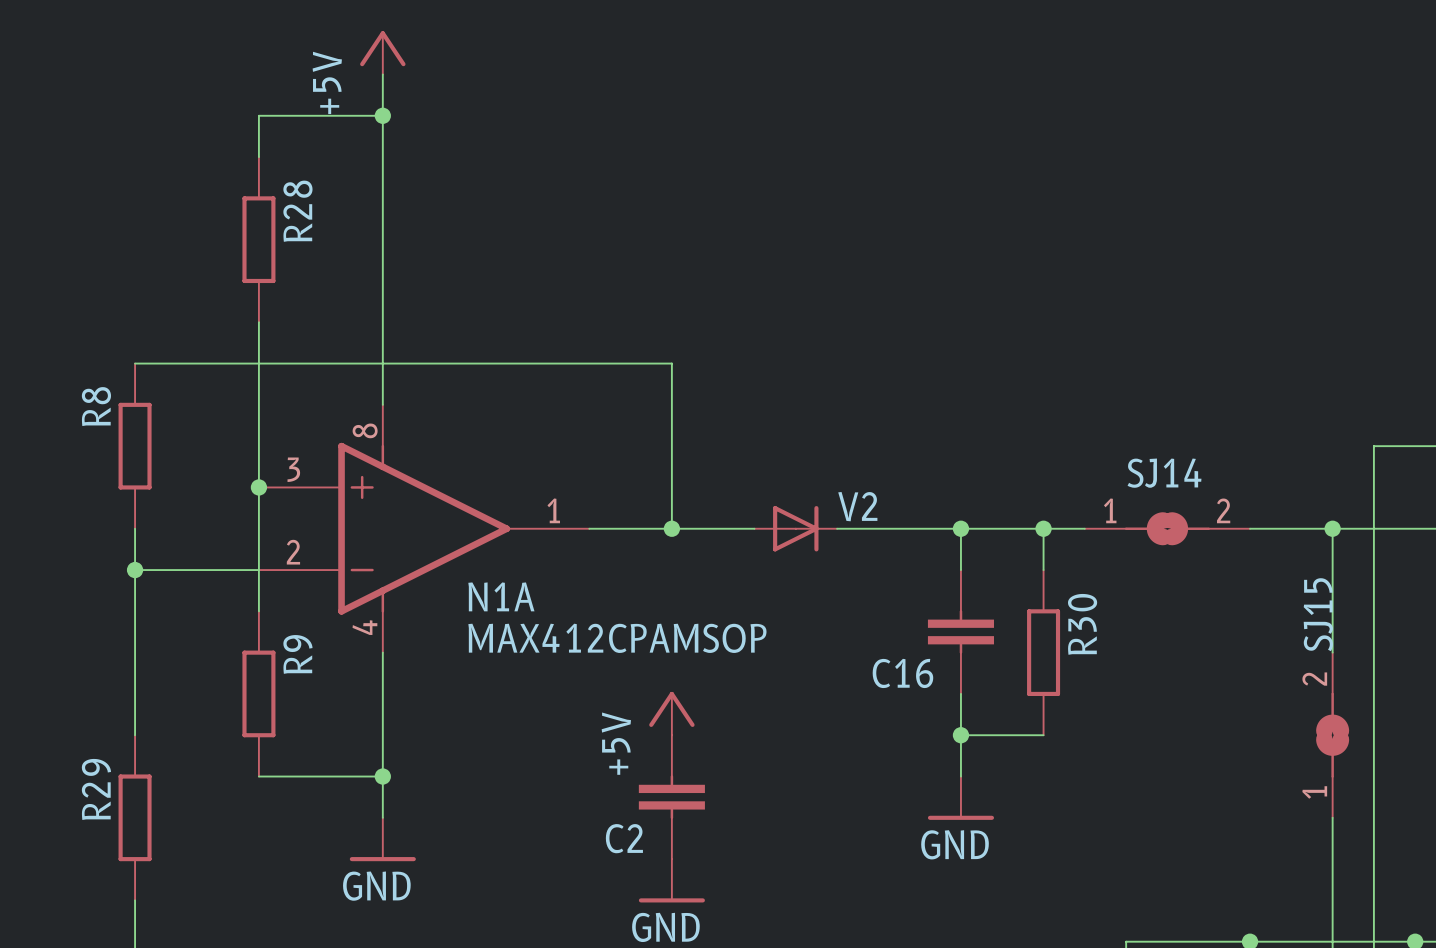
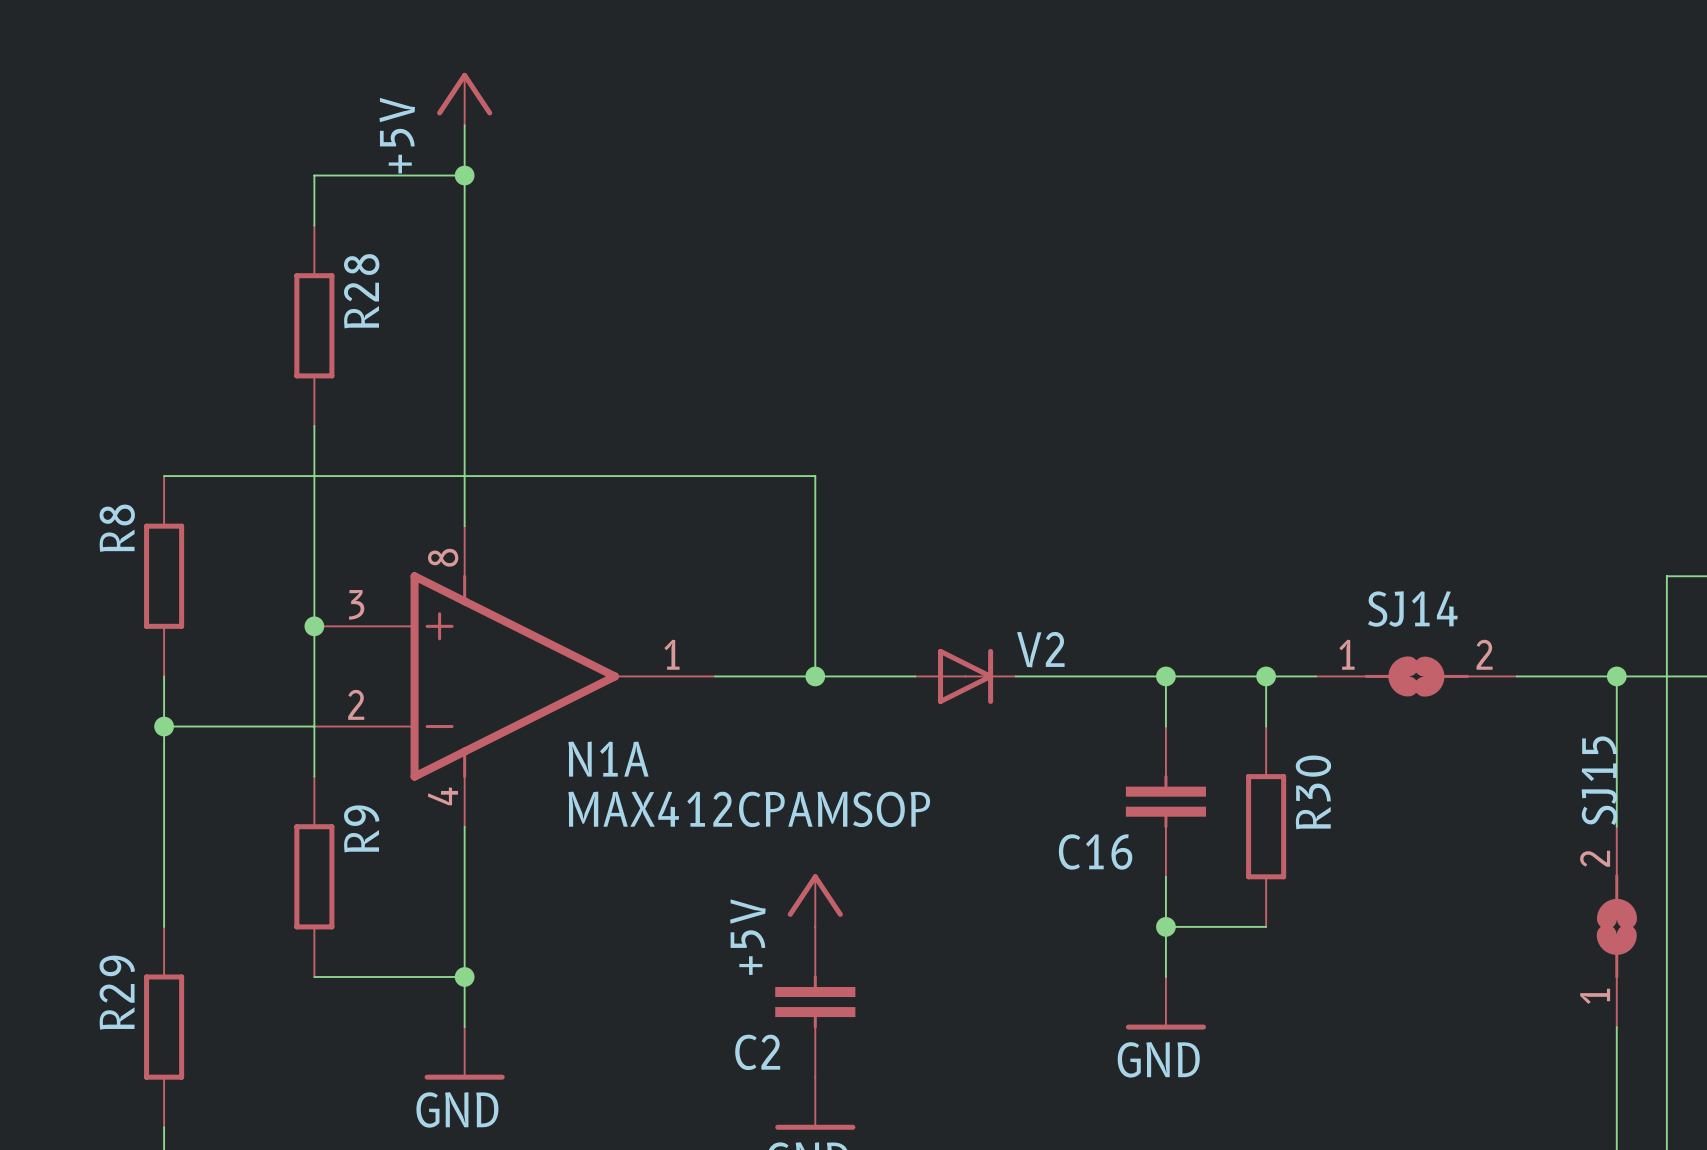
SJ14 symbol: [1084, 512, 1251, 546] -> [1316, 656, 1517, 697]
SJ15 symbol: [1316, 652, 1350, 818] -> [1596, 826, 1638, 1028]

